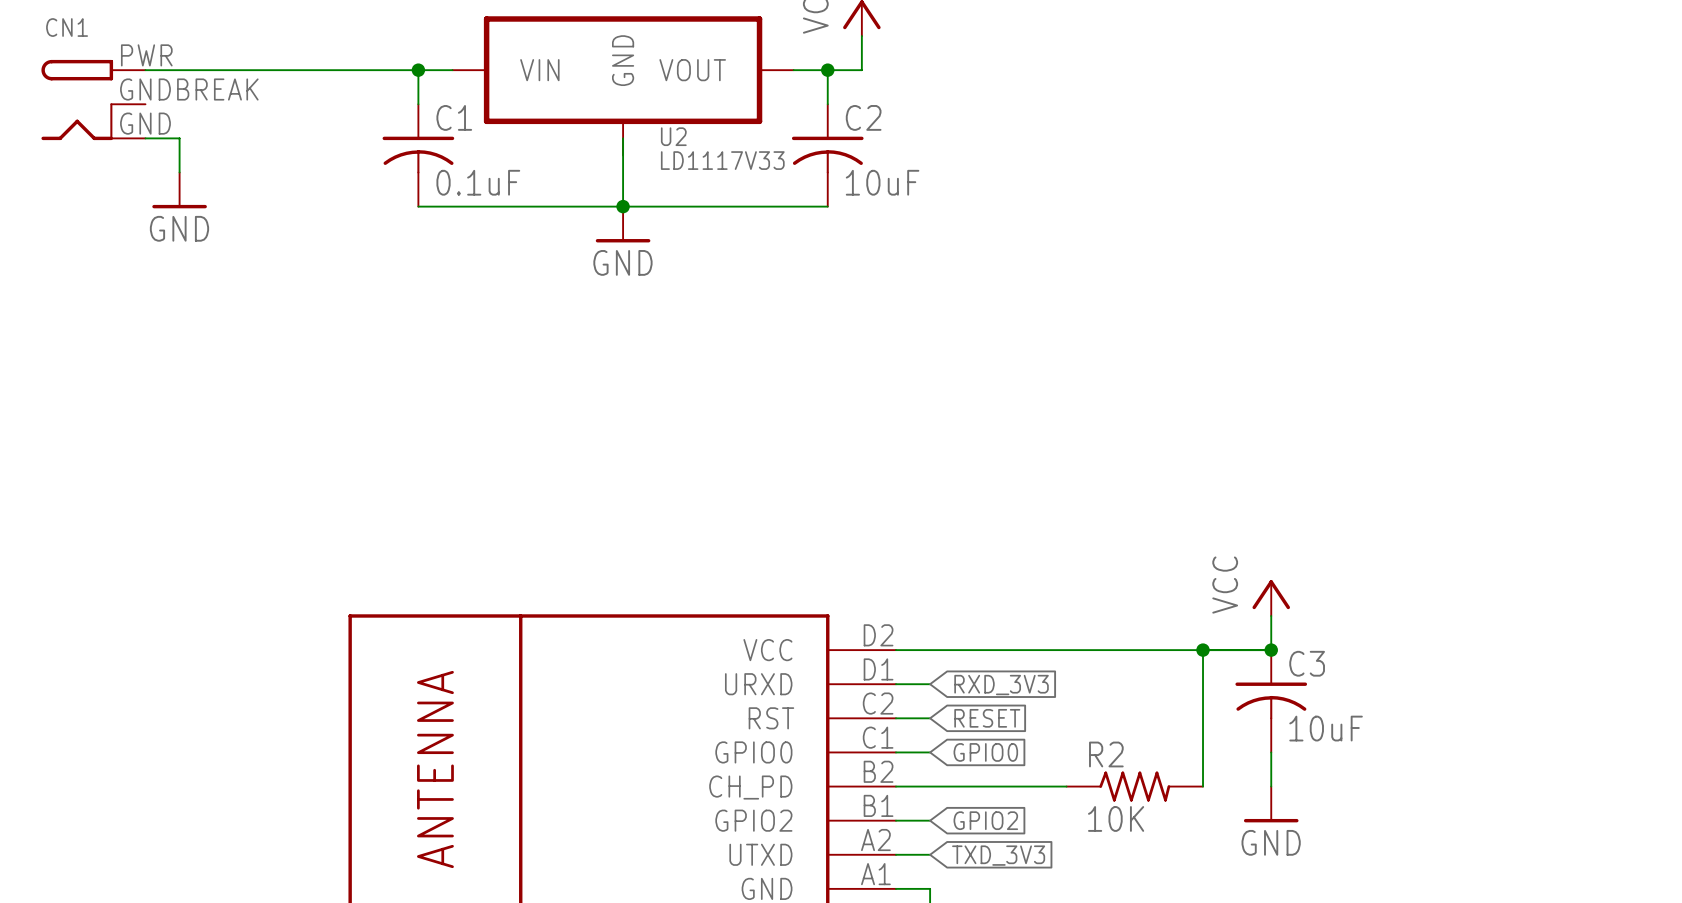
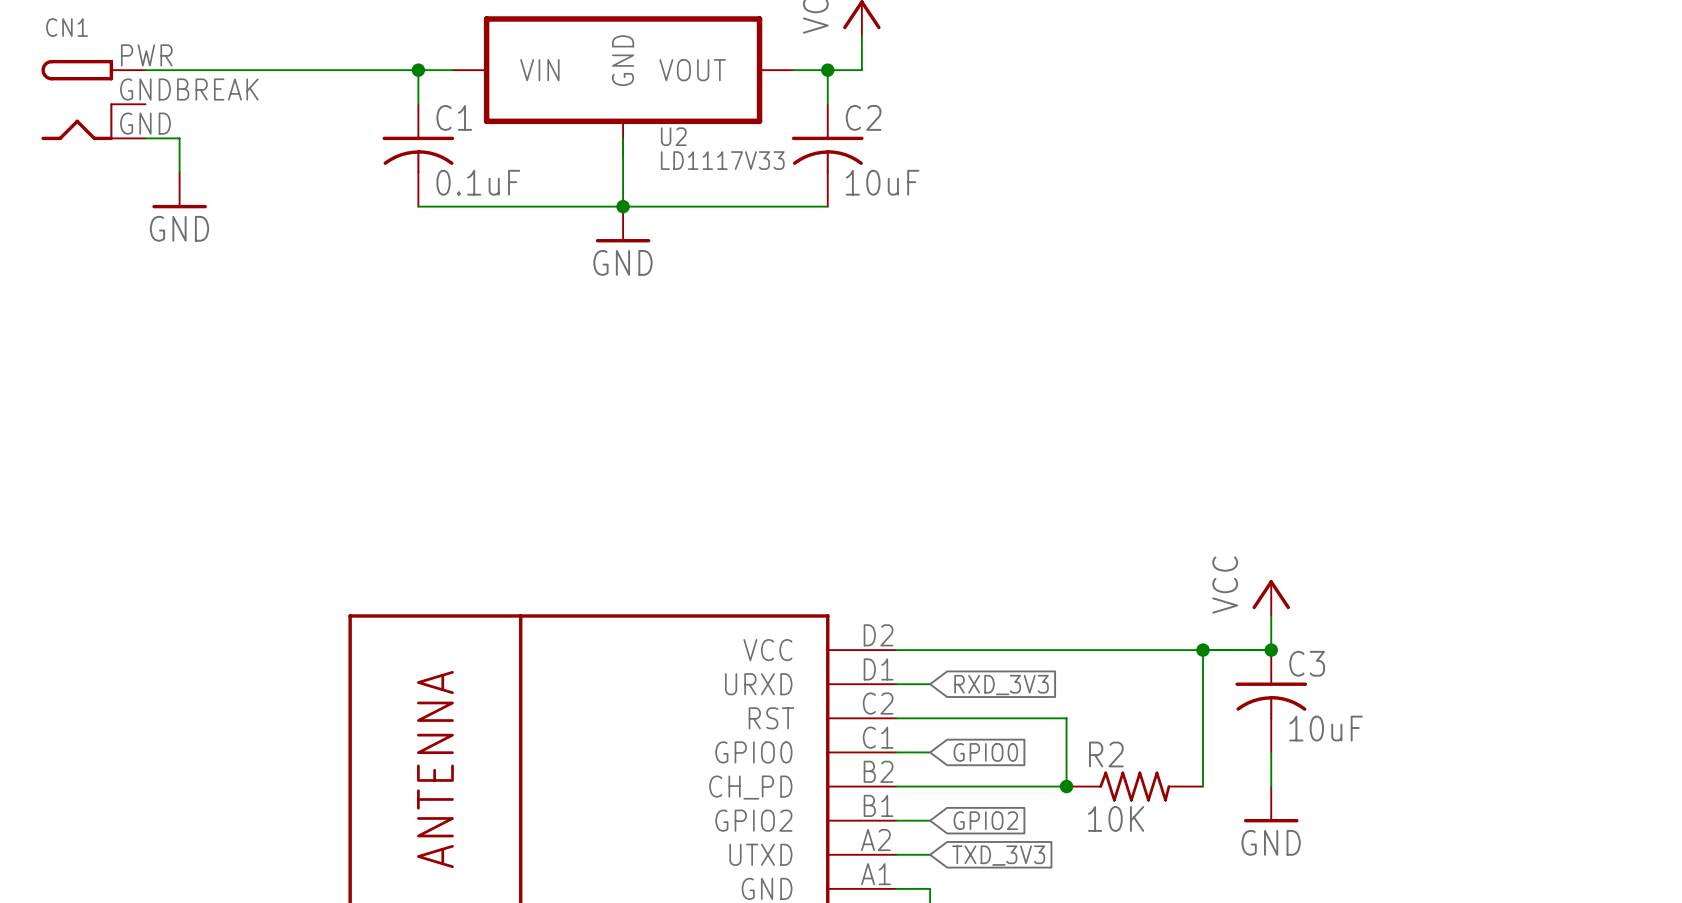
wire: none -> (930, 718) (1066, 718) (1066, 786)
global label: RESET (987, 718) -> none
junction: none -> (1066, 786)

